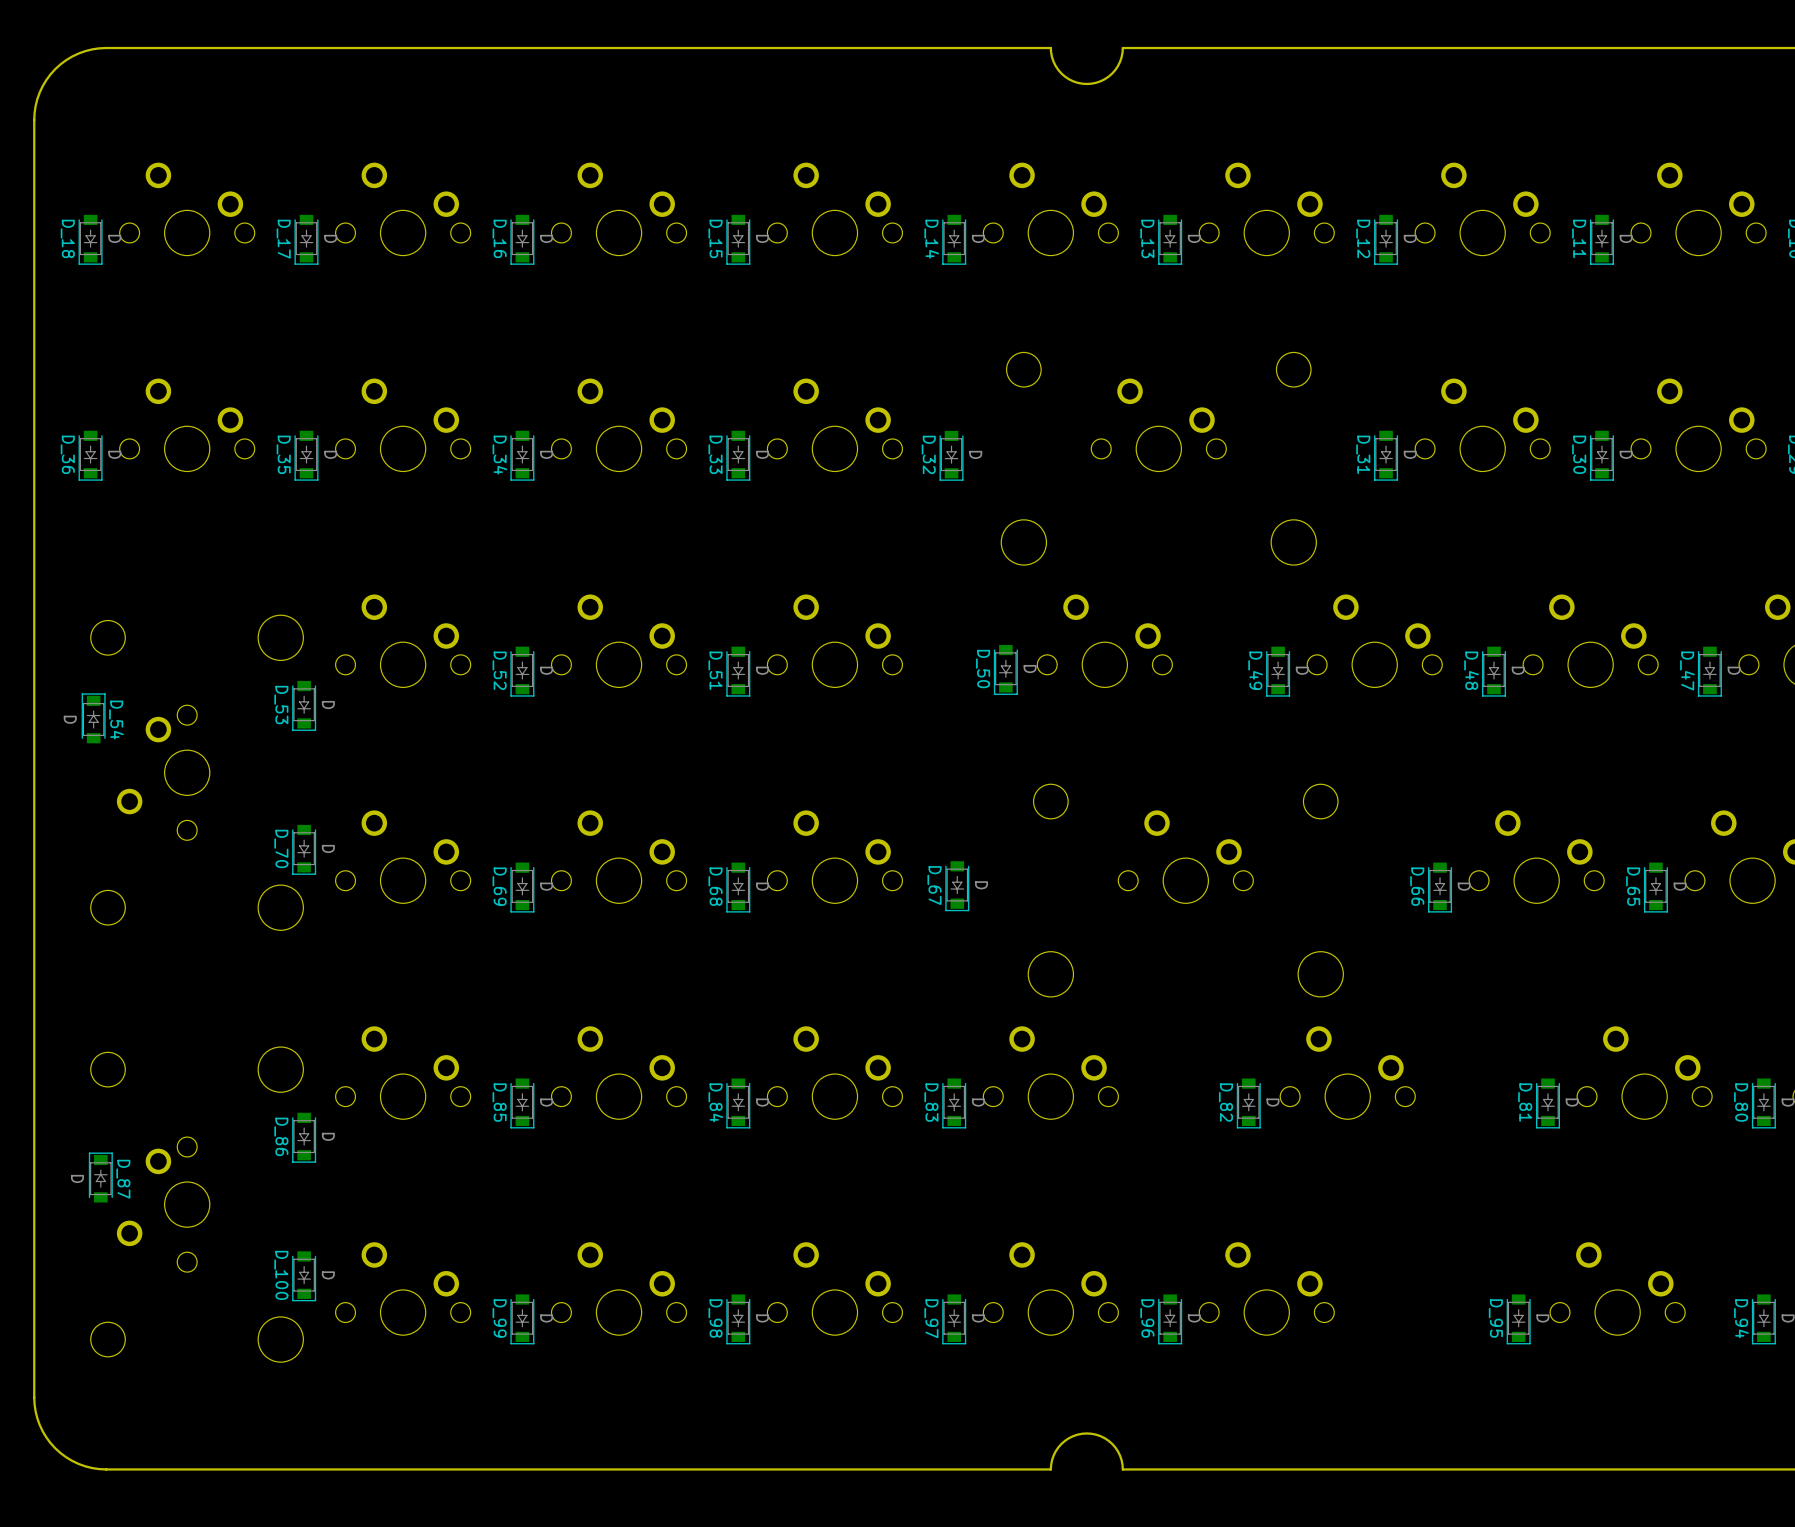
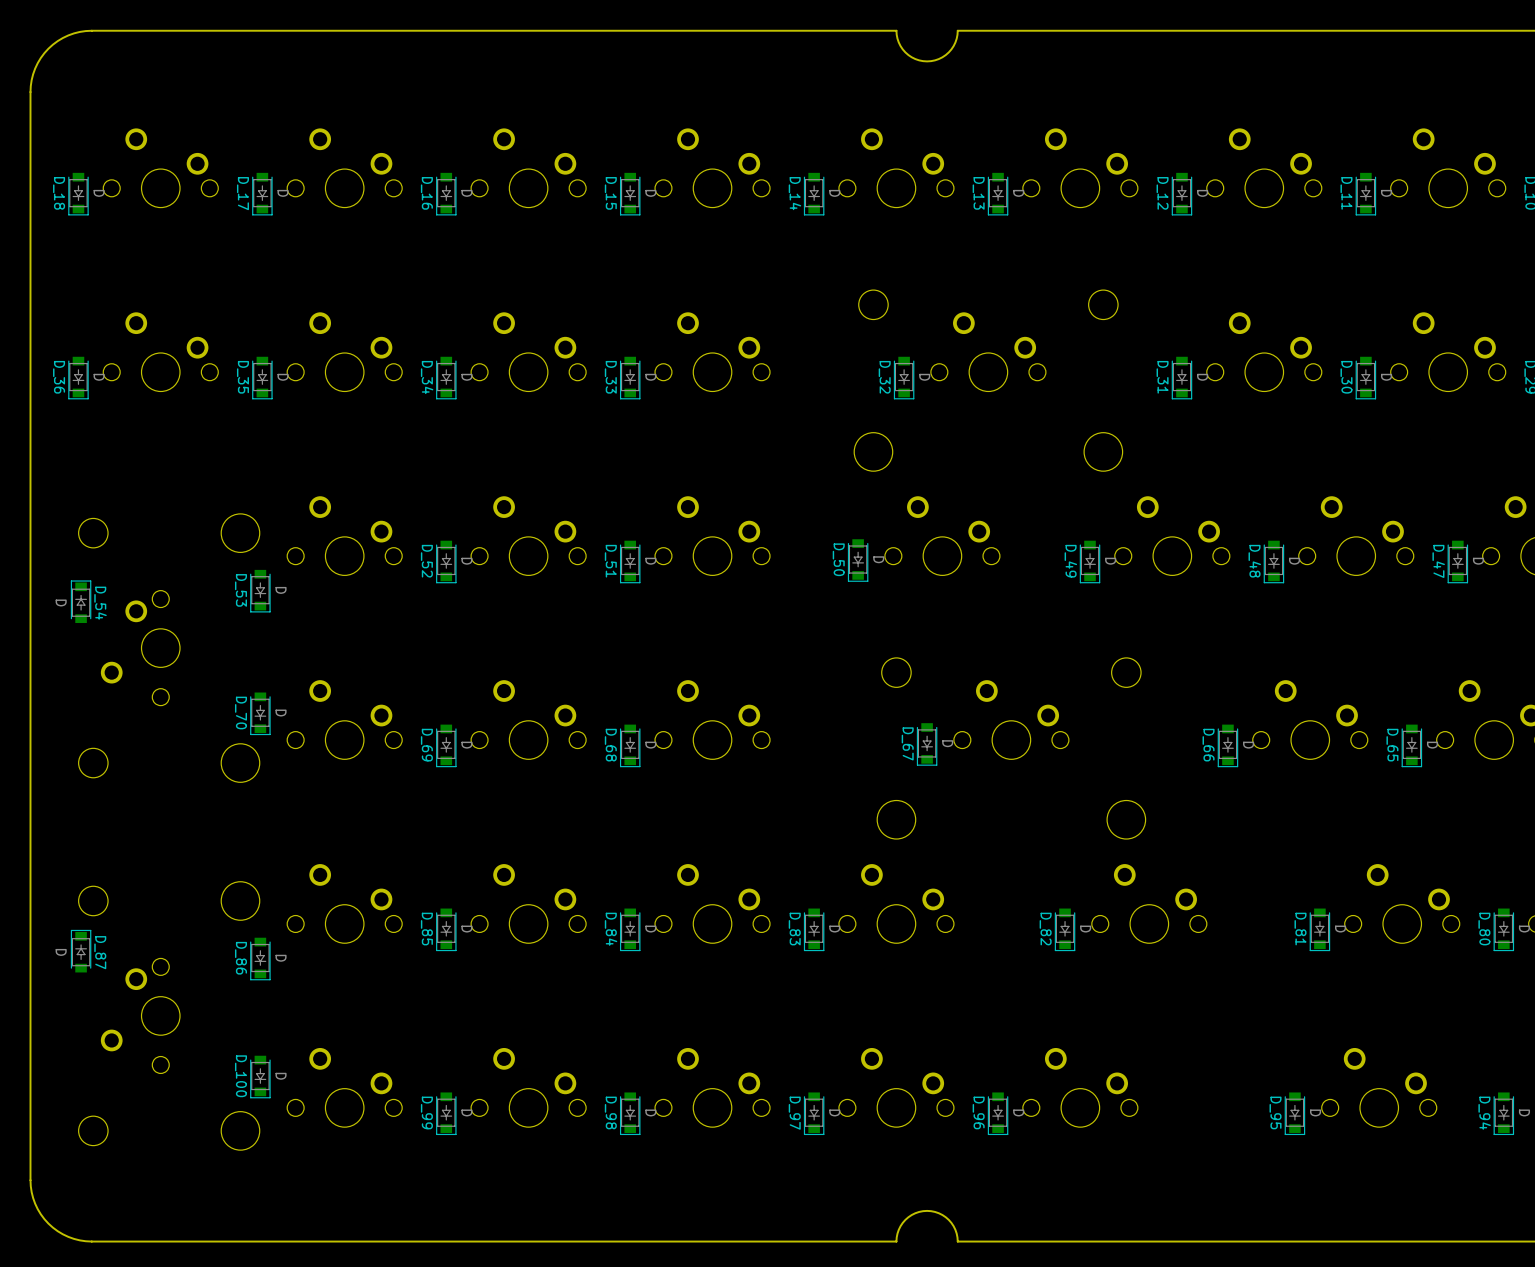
D_32 position: (951, 455) -> (904, 378)
D_67 position: (957, 886) -> (927, 744)
D_87 position: (100, 1177) -> (81, 951)

